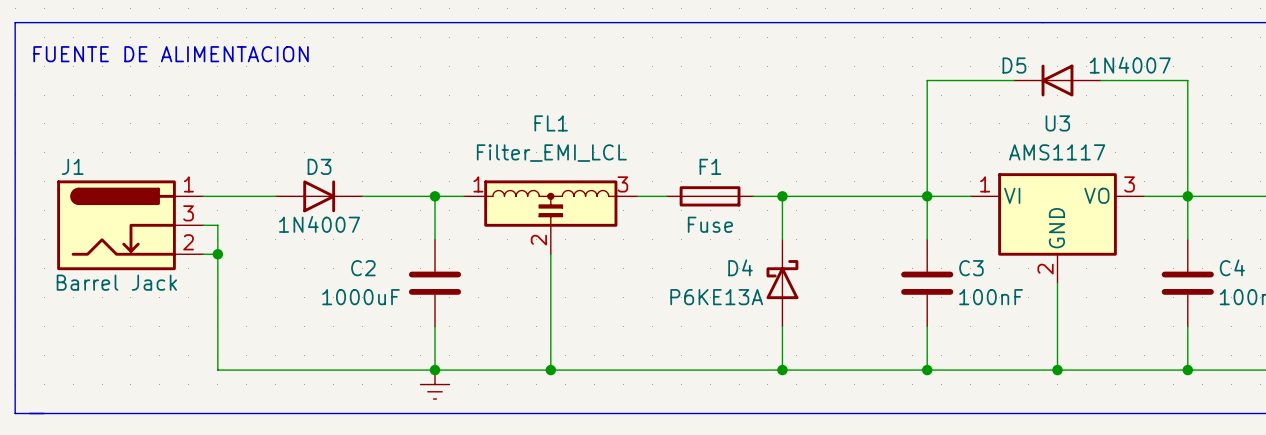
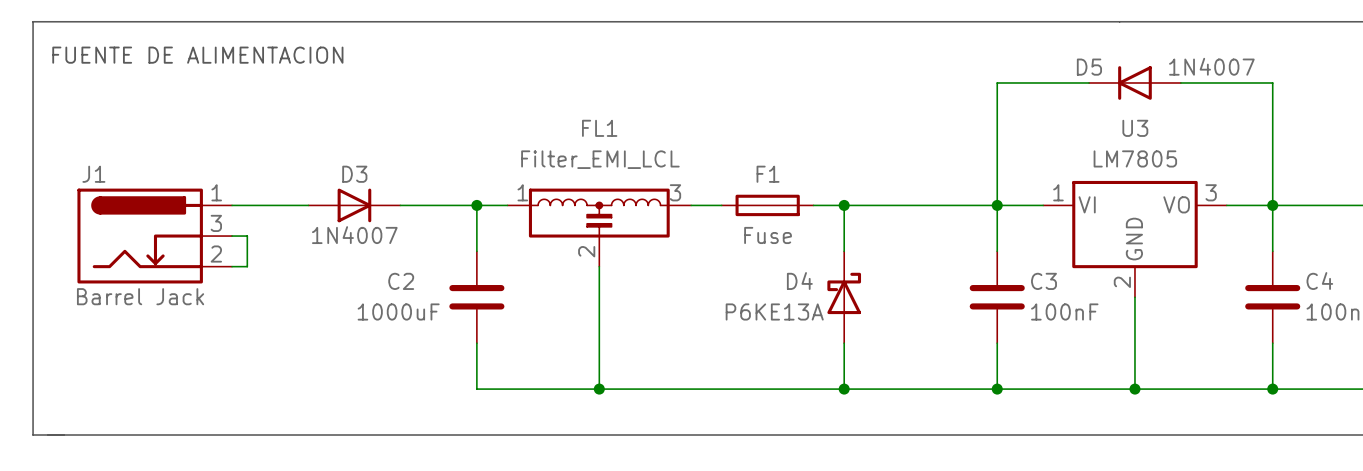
U3 value: AMS1117 (1057, 152) -> LM7805 (1135, 158)
wire: (217, 254) (217, 370) (434, 370) -> none
junction: (217, 254) -> none
junction: (434, 370) -> none
power symbol: (434, 384) -> none

